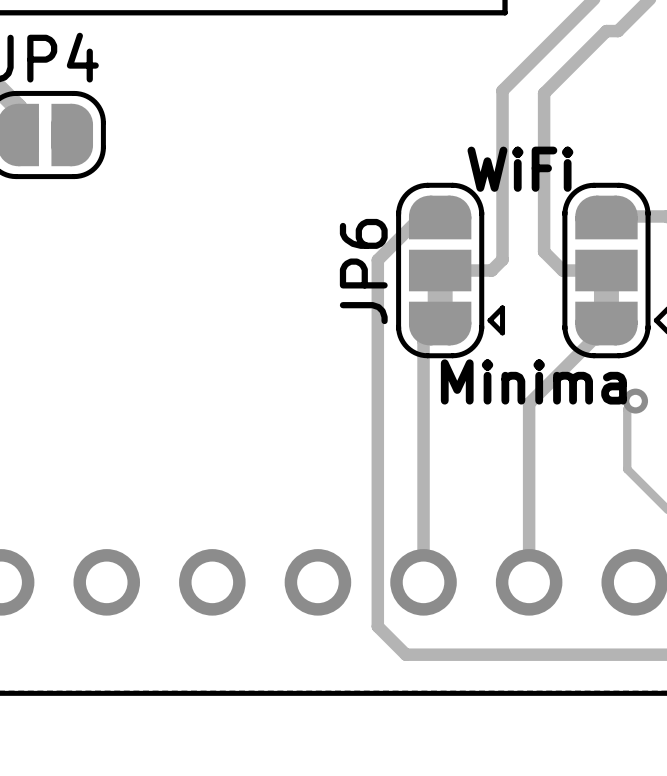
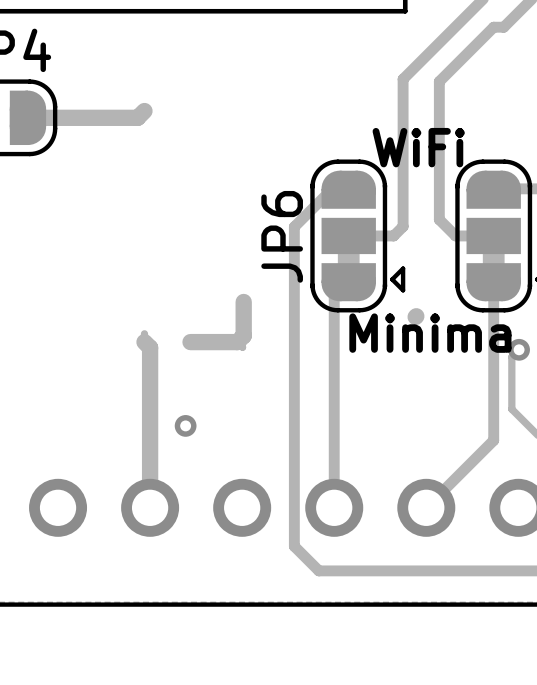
track: none -> (144, 111) (137, 117) (27, 117)
track: (606, 326) (529, 403) (529, 582) -> (493, 284) (493, 440) (426, 507)
track: none -> (243, 301) (243, 335) (237, 342)
track: none -> (416, 316) (415, 316)
track: none -> (144, 333) (144, 342) (150, 347) (150, 507)
track: none -> (190, 342) (237, 342)
via: none -> (185, 425)

